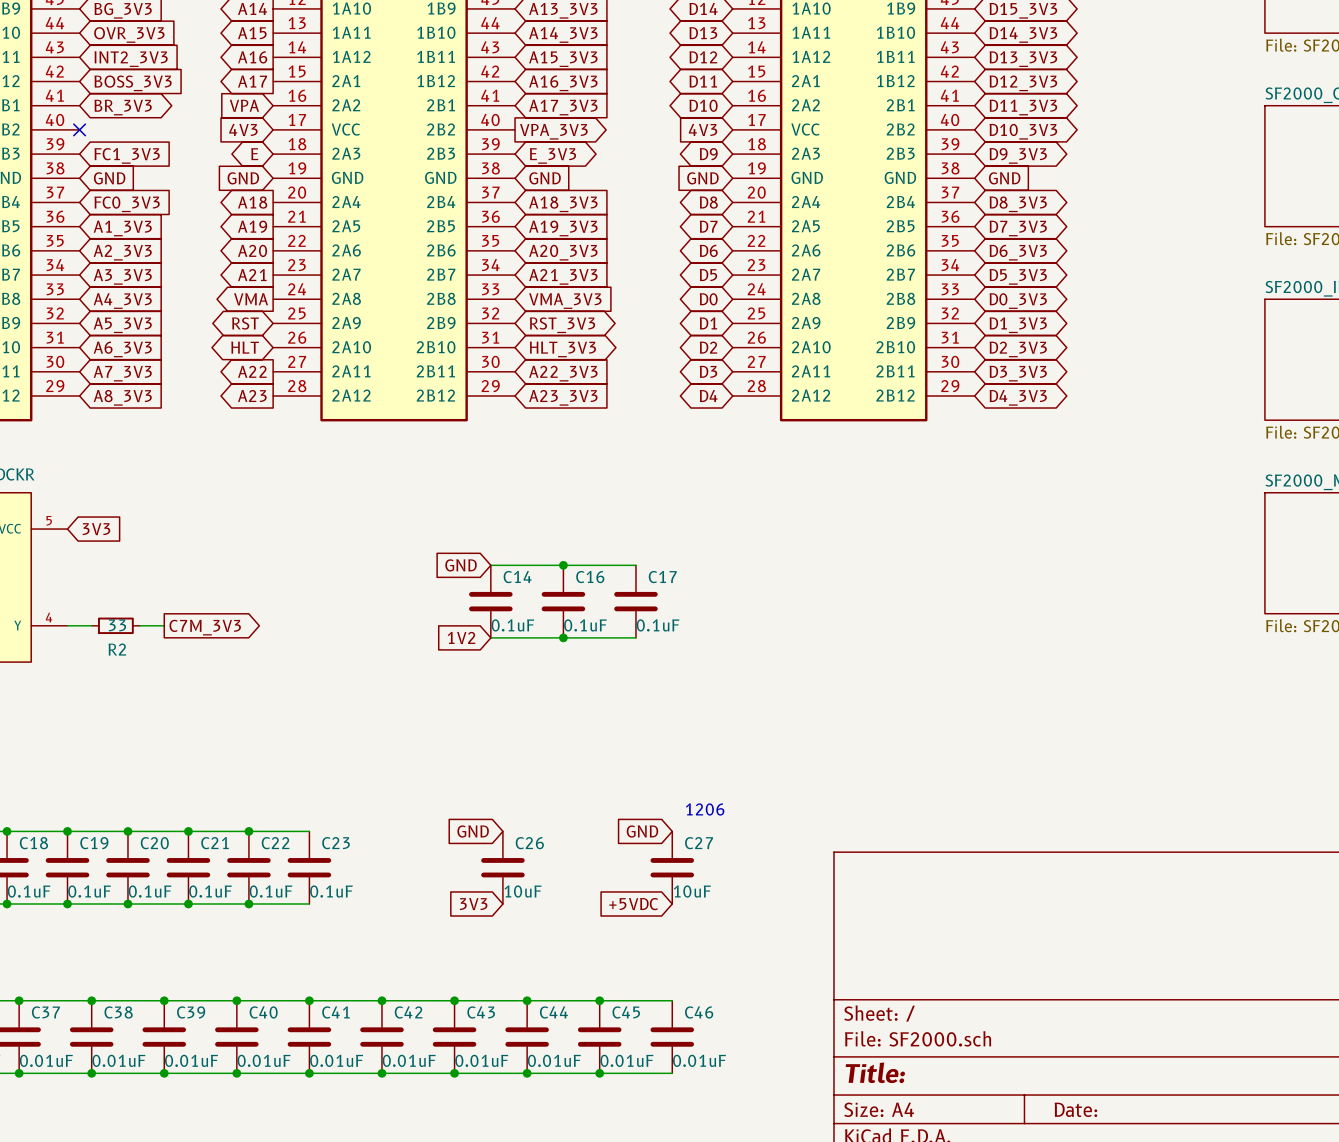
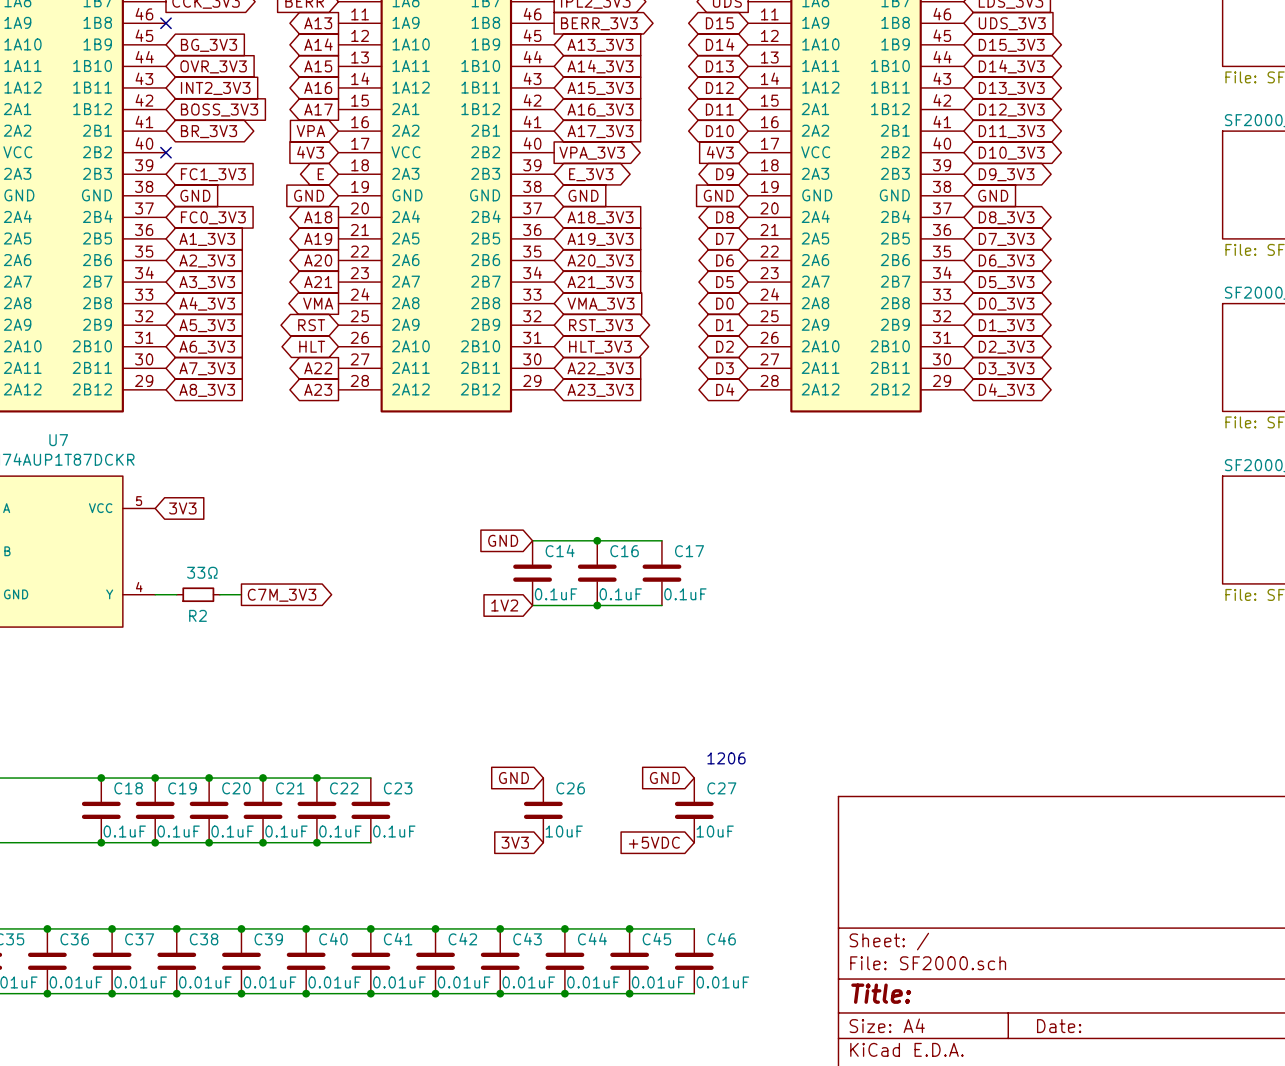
R2 value: 33 (117, 625) -> 33Ω (202, 572)

